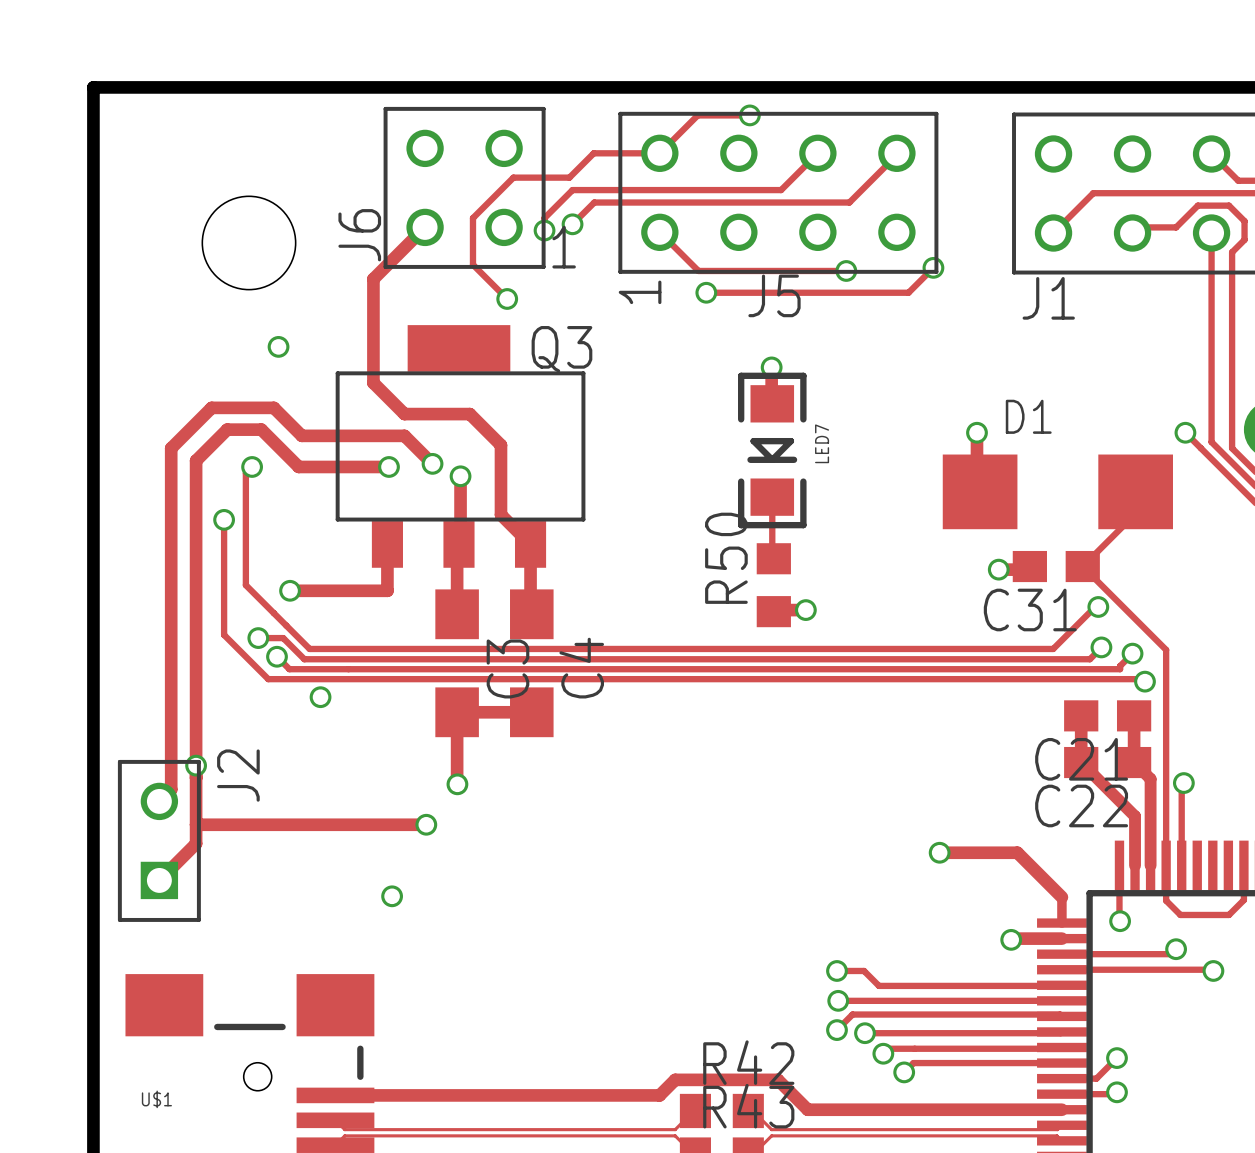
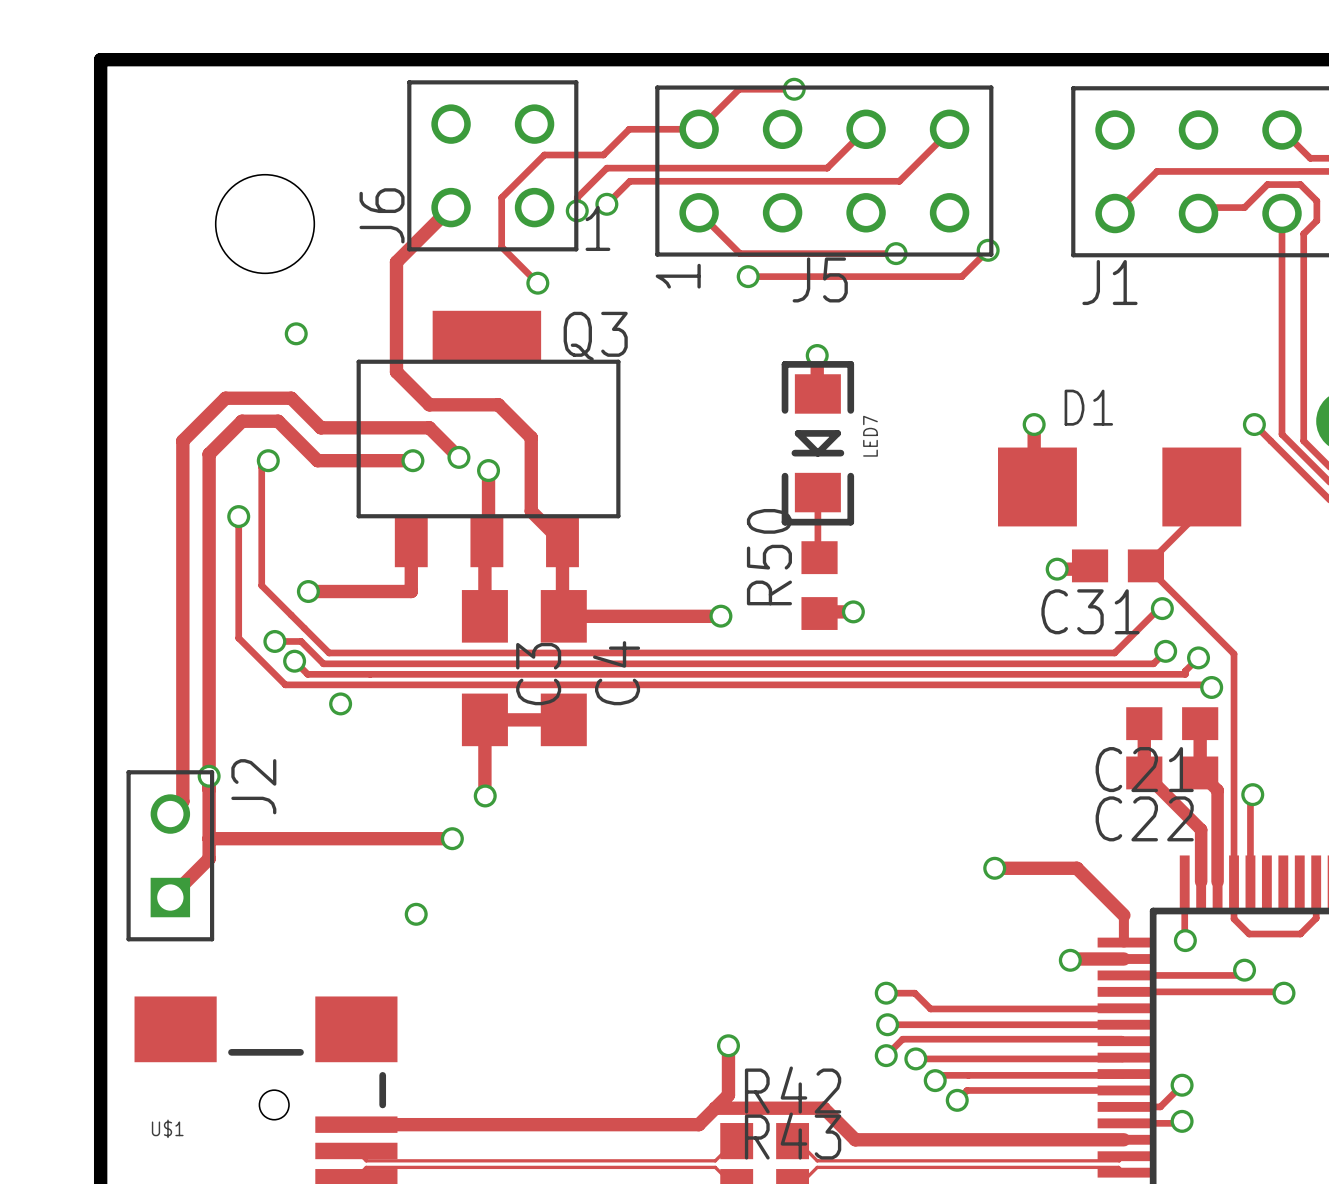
track: none -> (568, 616) (720, 616)
via: none -> (720, 616)
track: none -> (728, 1045) (728, 1095) (715, 1108)
via: none -> (728, 1045)

